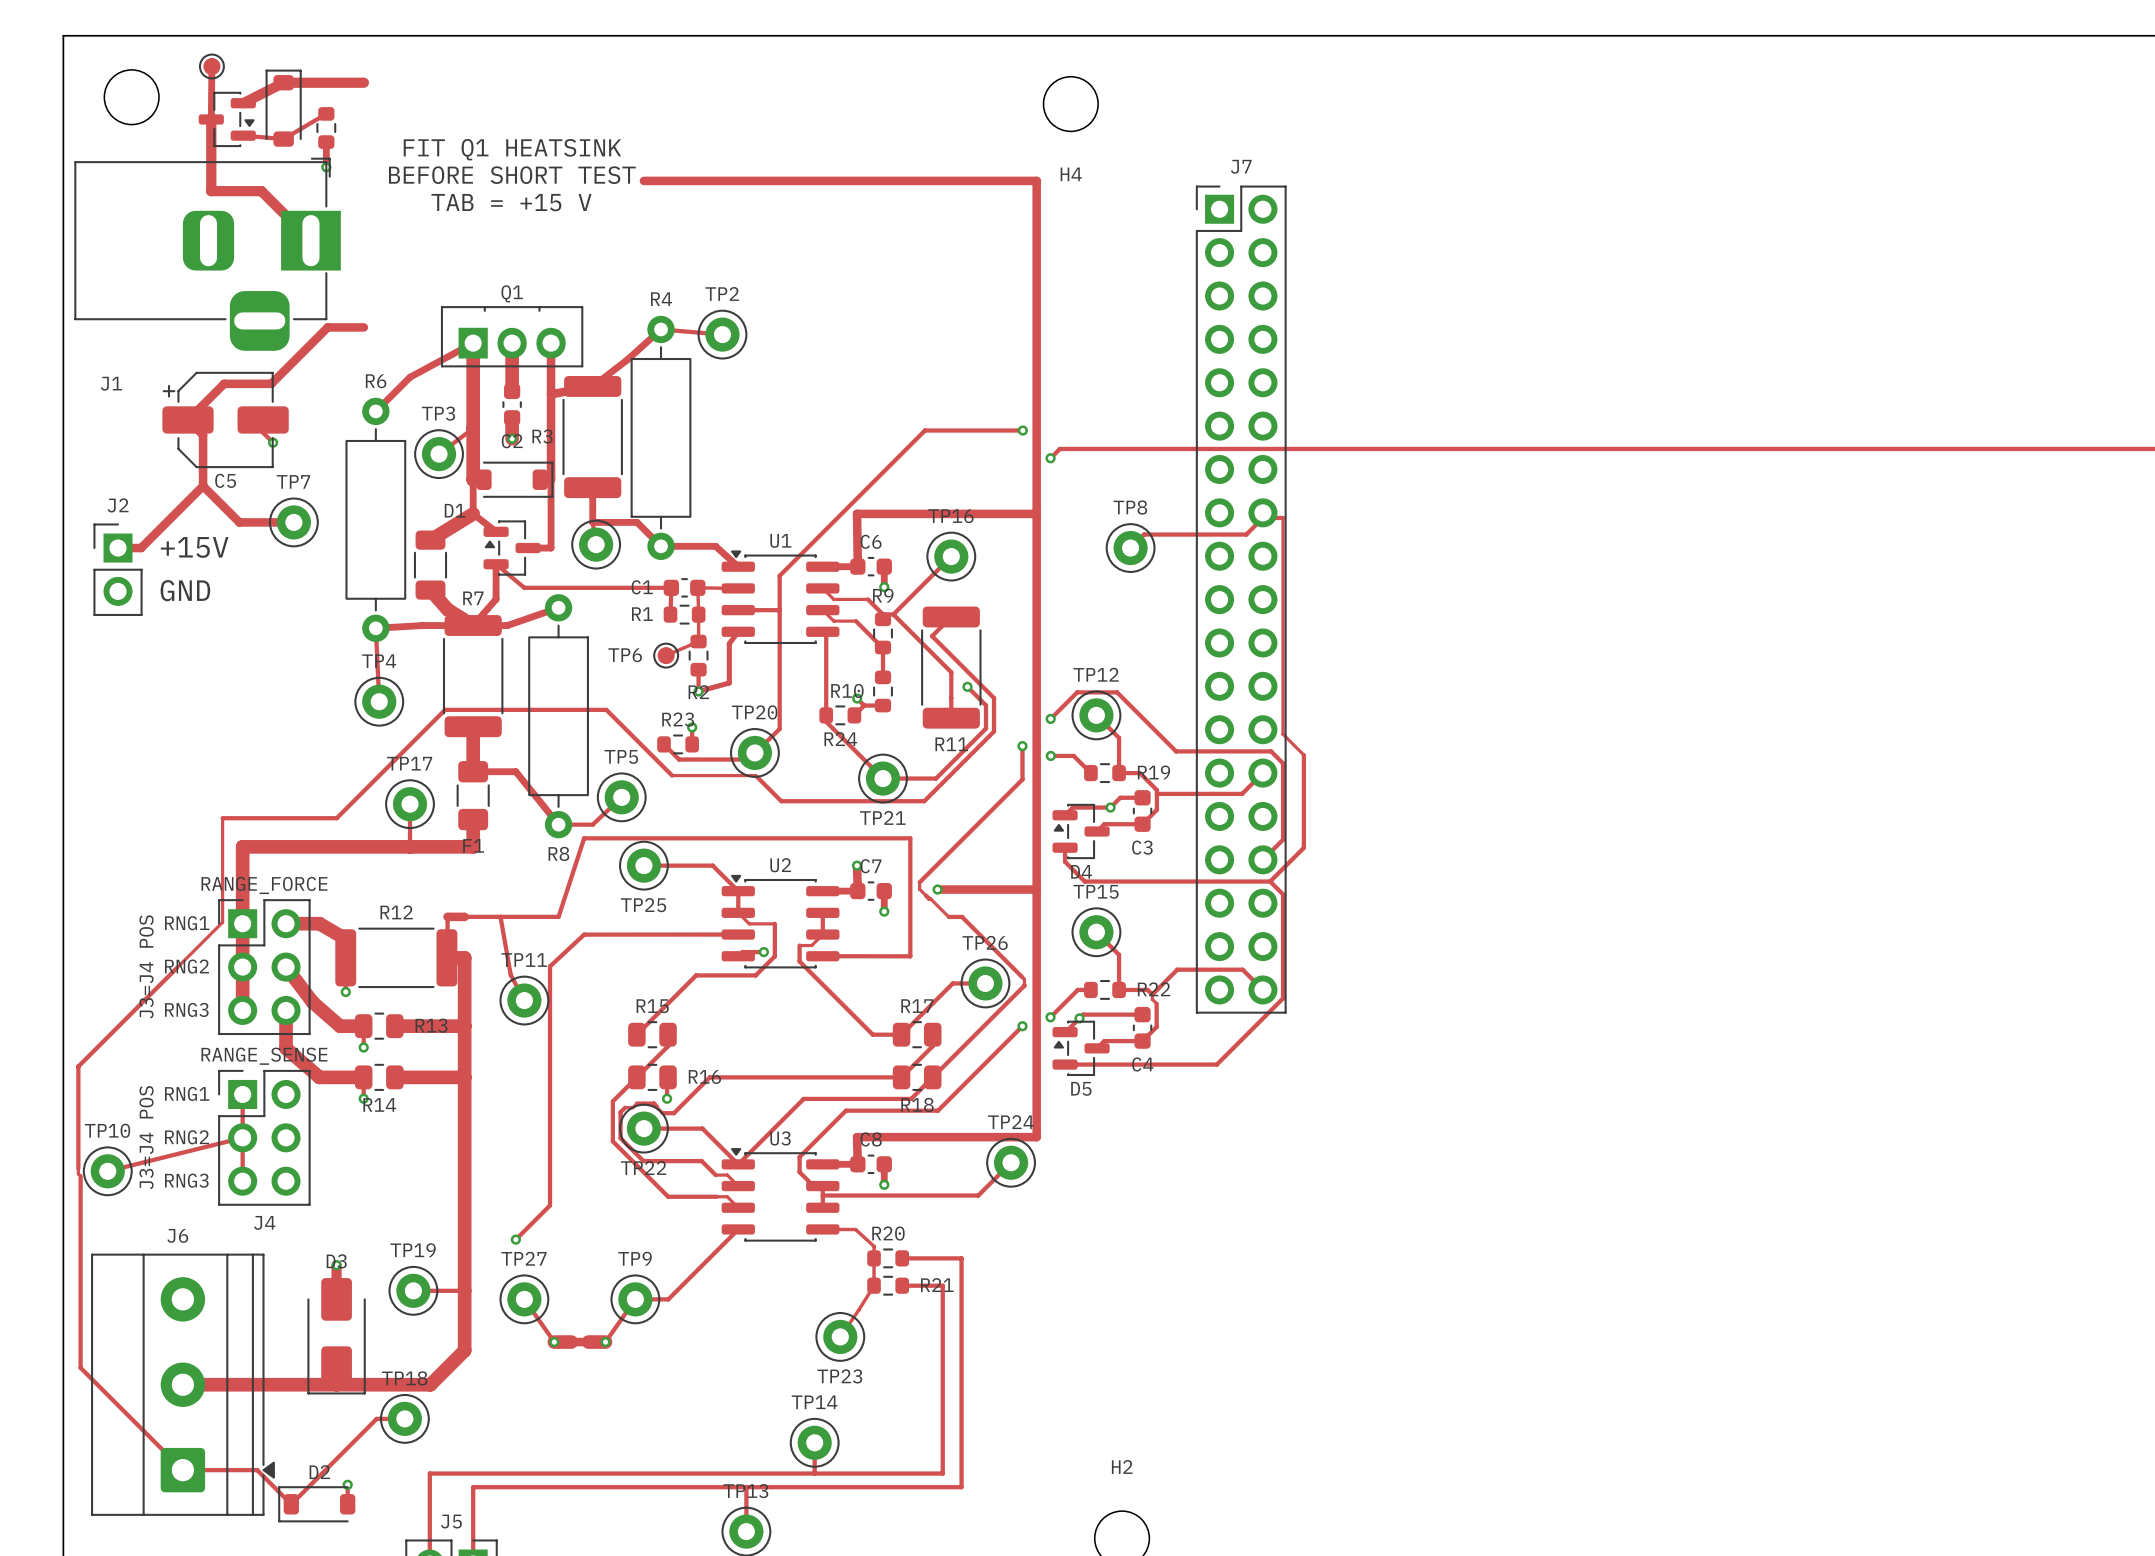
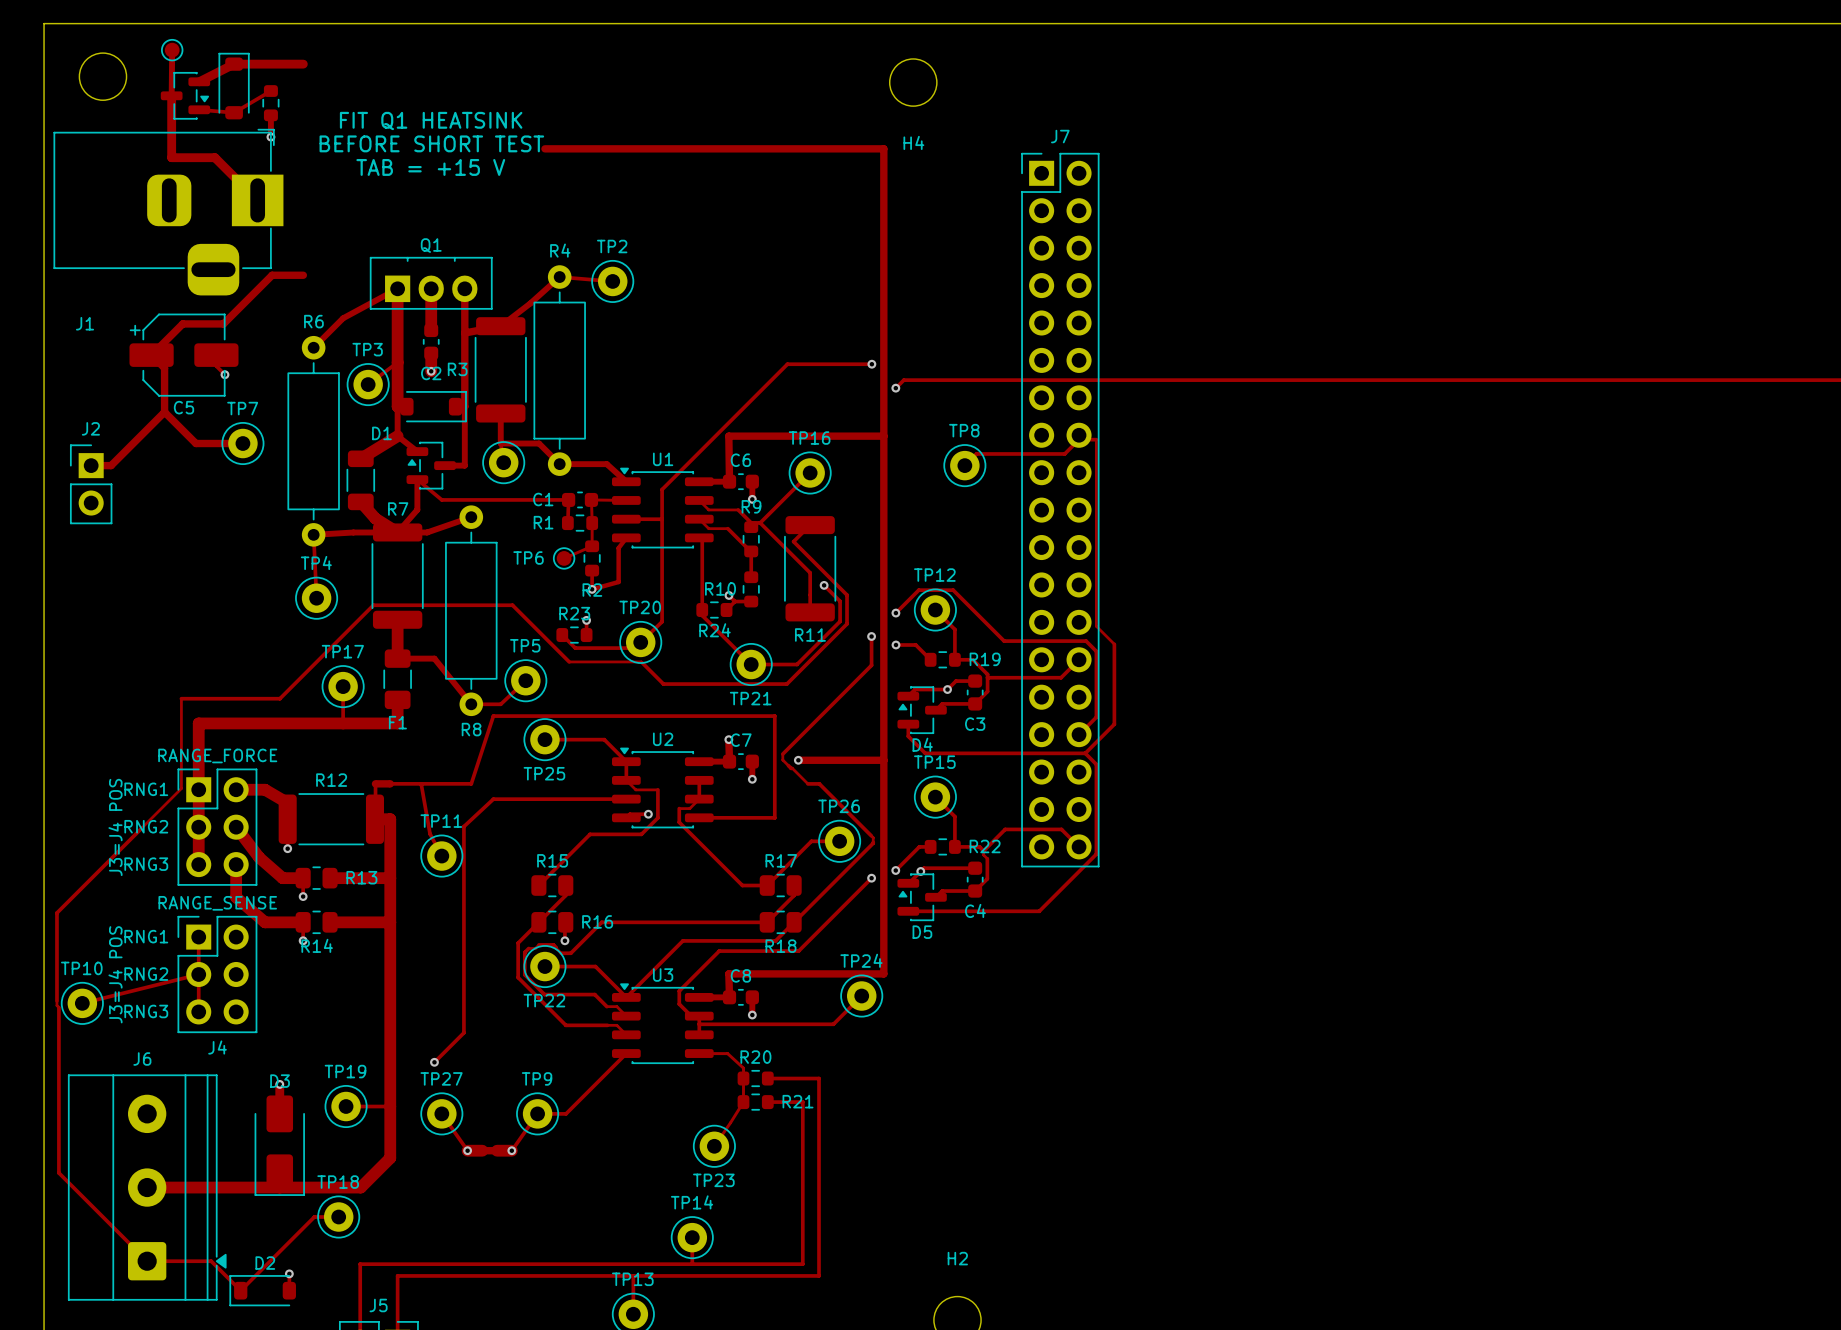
text: +15V (194, 547) -> none
text: GND (185, 590) -> none

